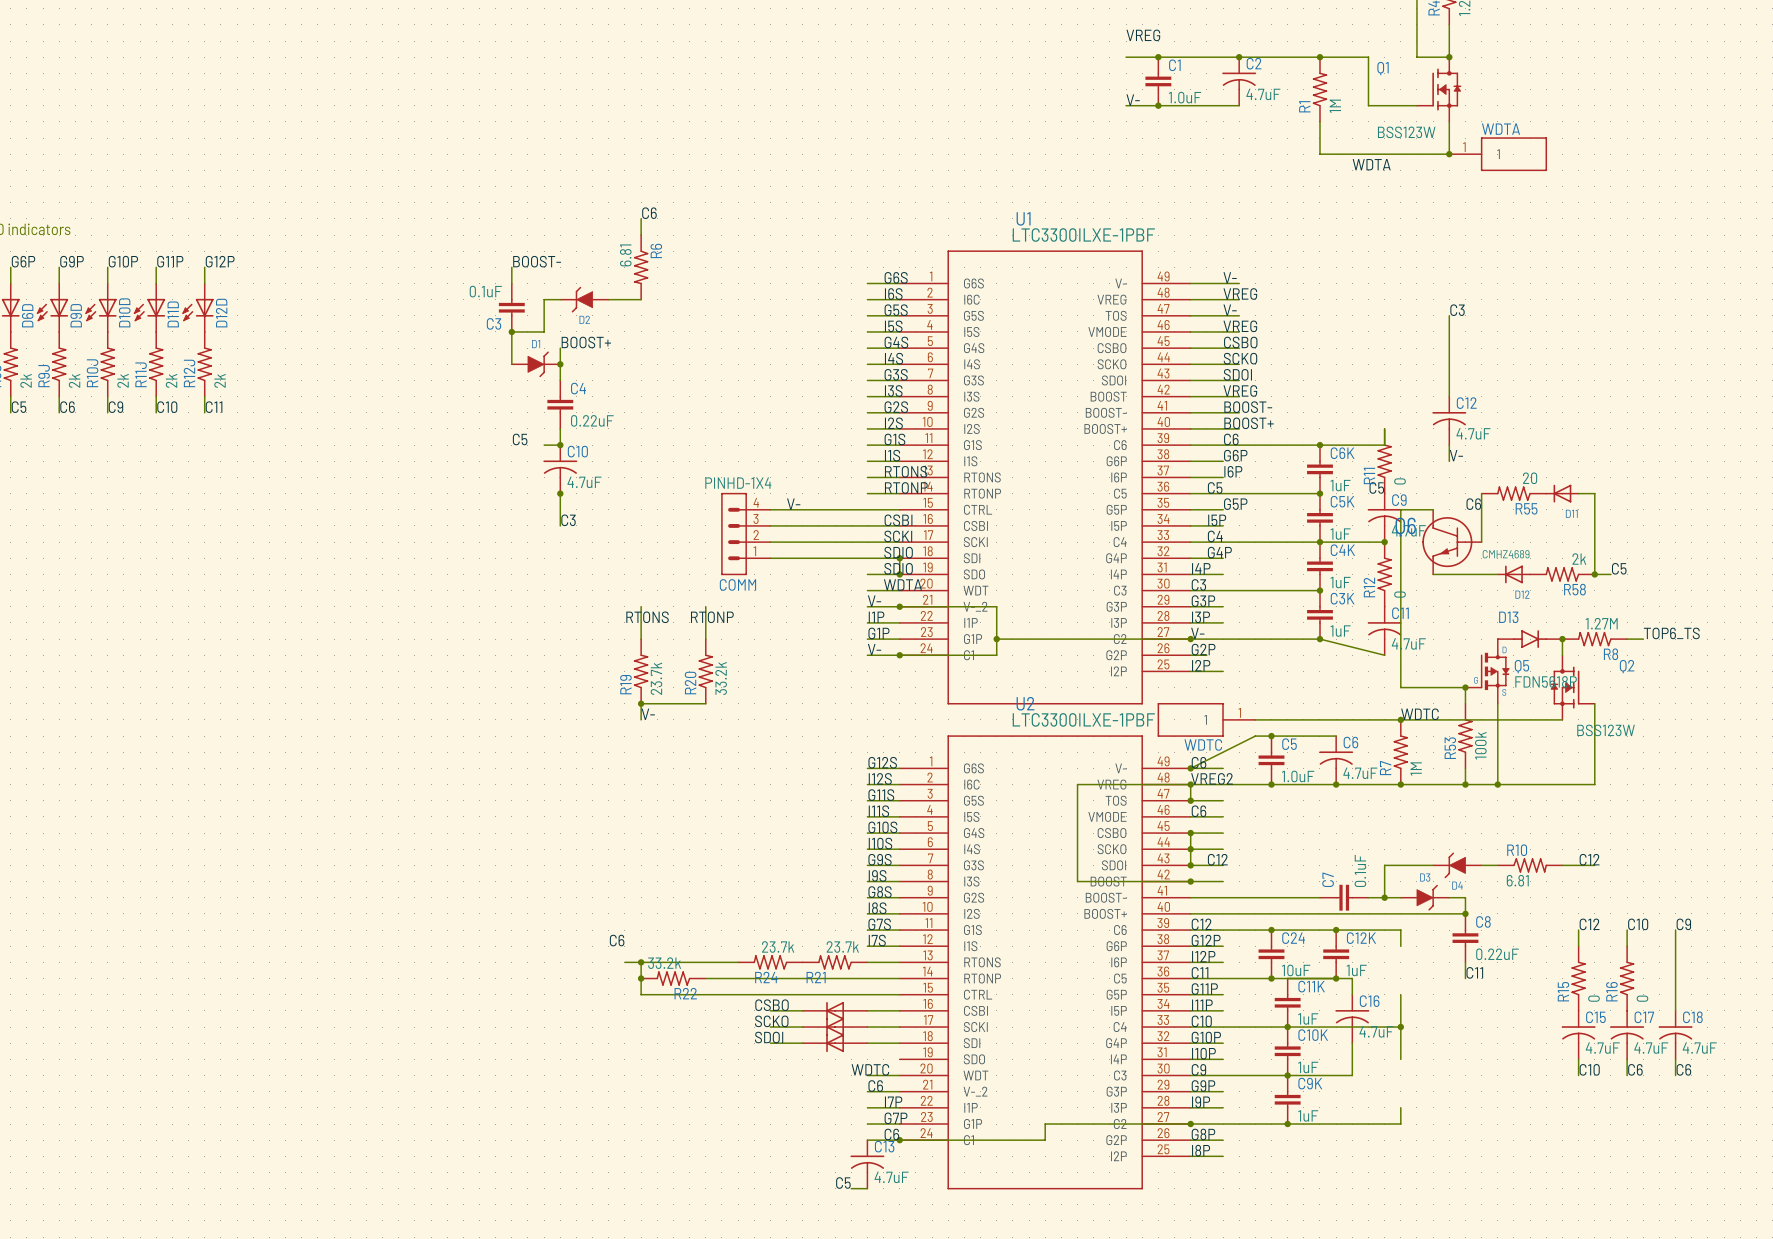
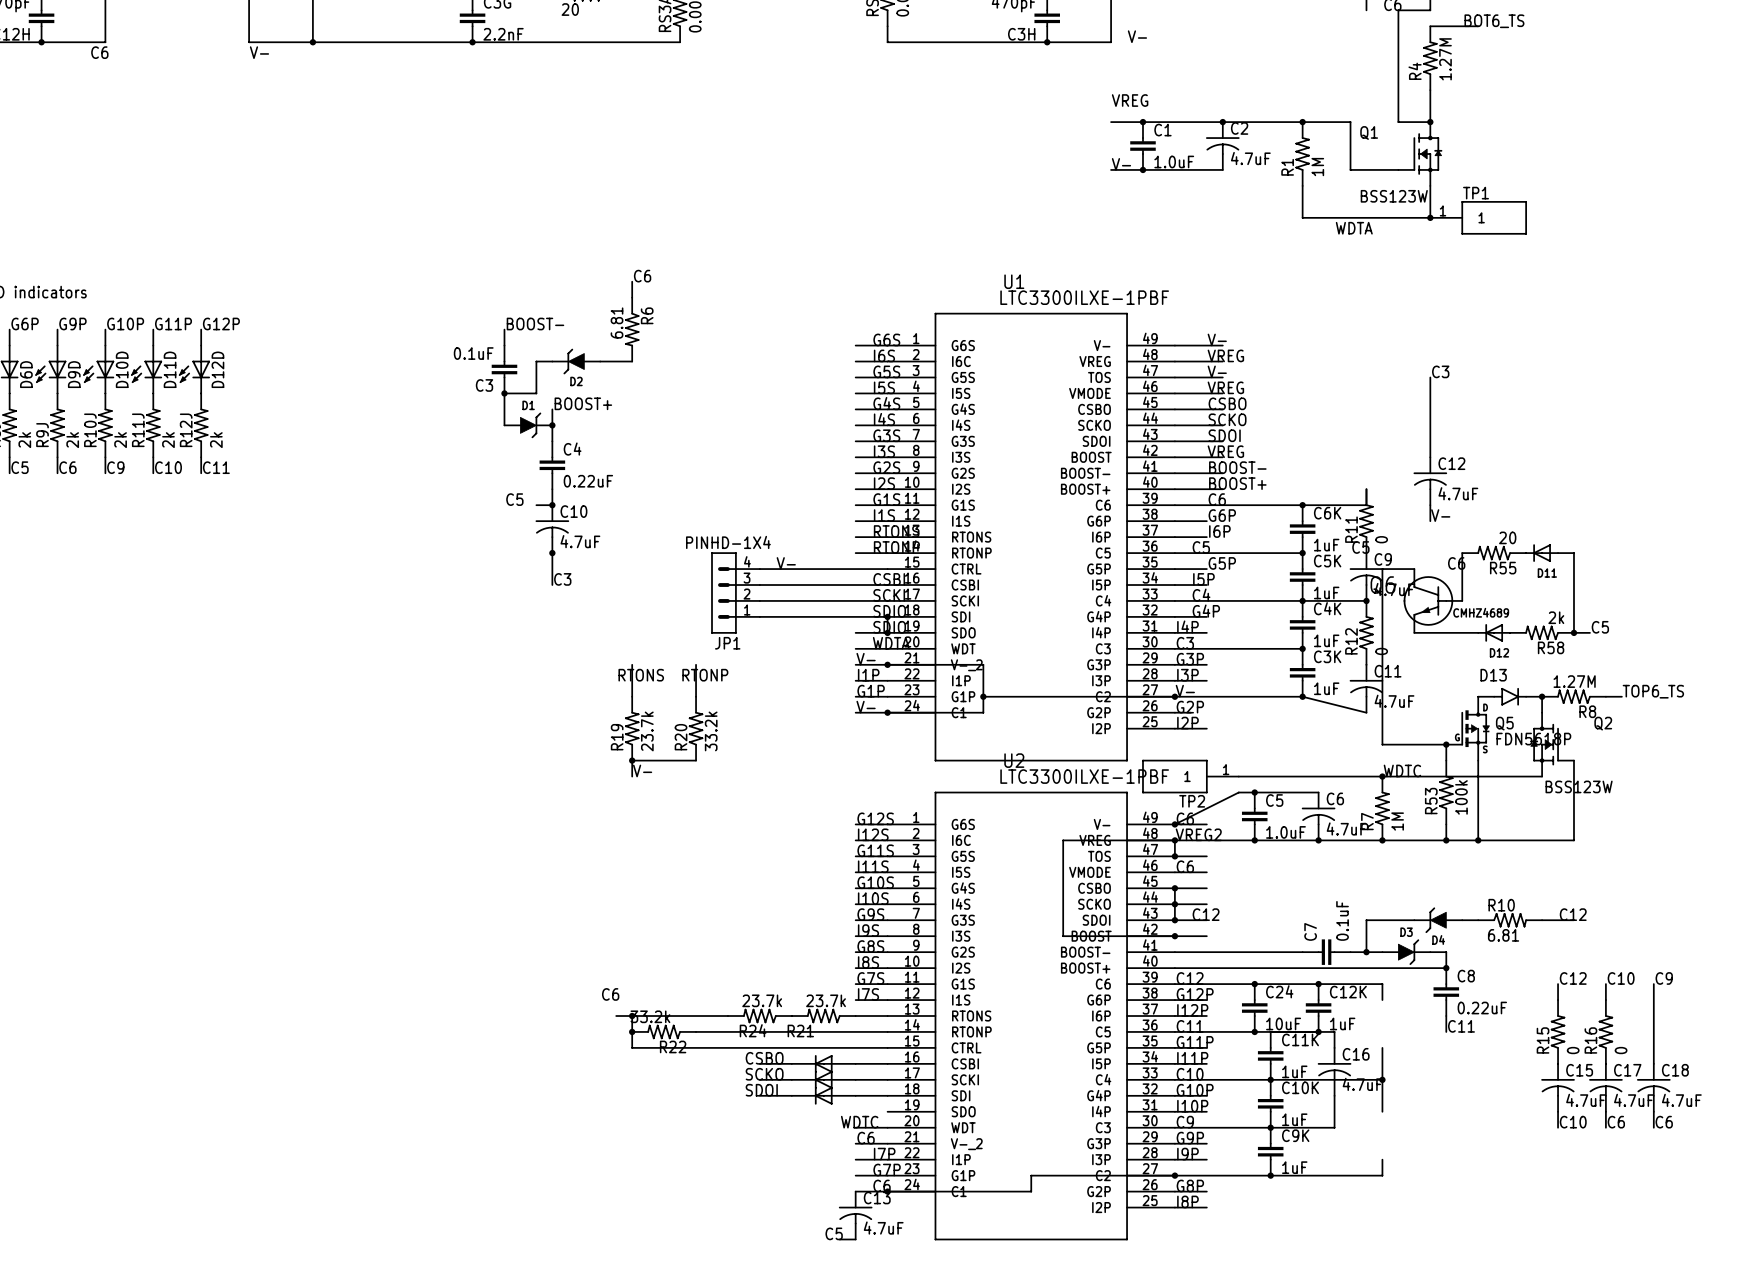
WDTA name: WDTA (1501, 129) -> TP1 (1476, 193)
COMM name: COMM (737, 584) -> JP1 (727, 643)
WDTC name: WDTC (1203, 744) -> TP2 (1192, 801)

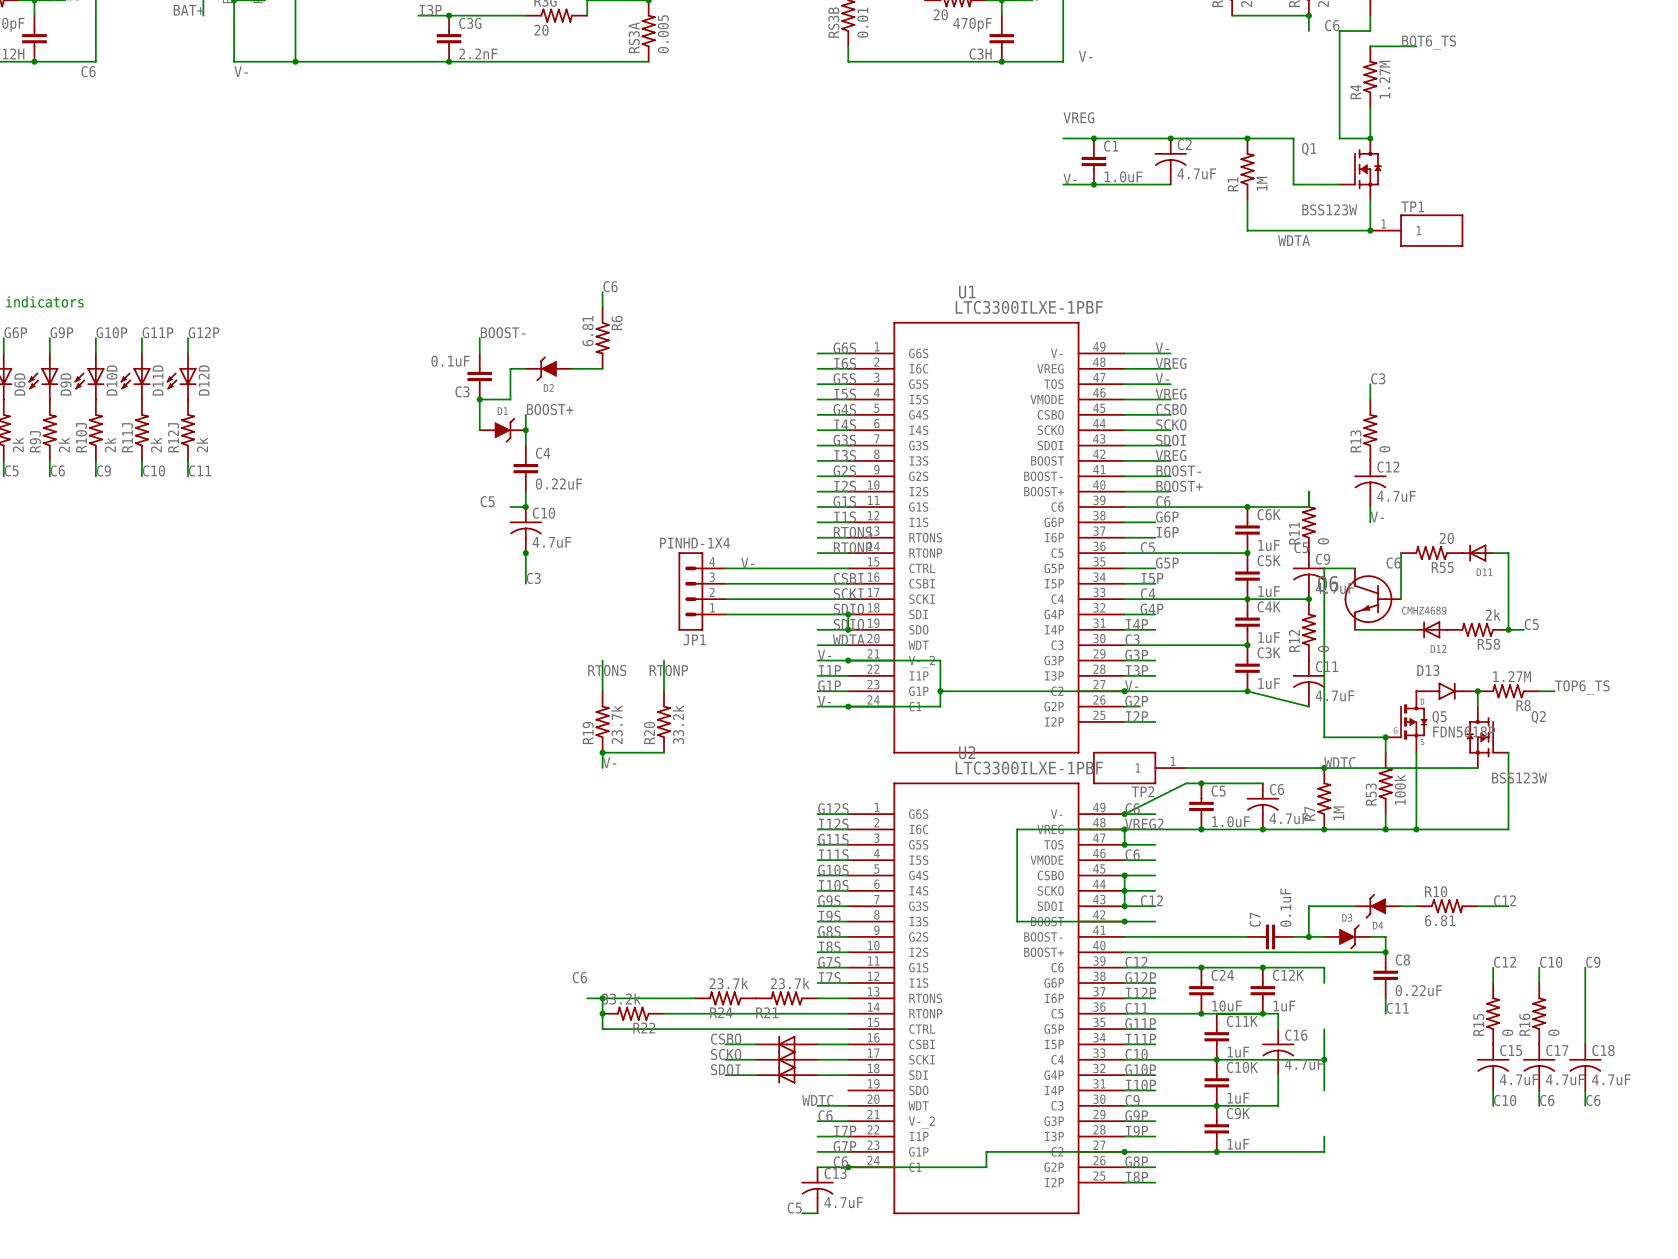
R13: none -> 0 (1370, 430)

